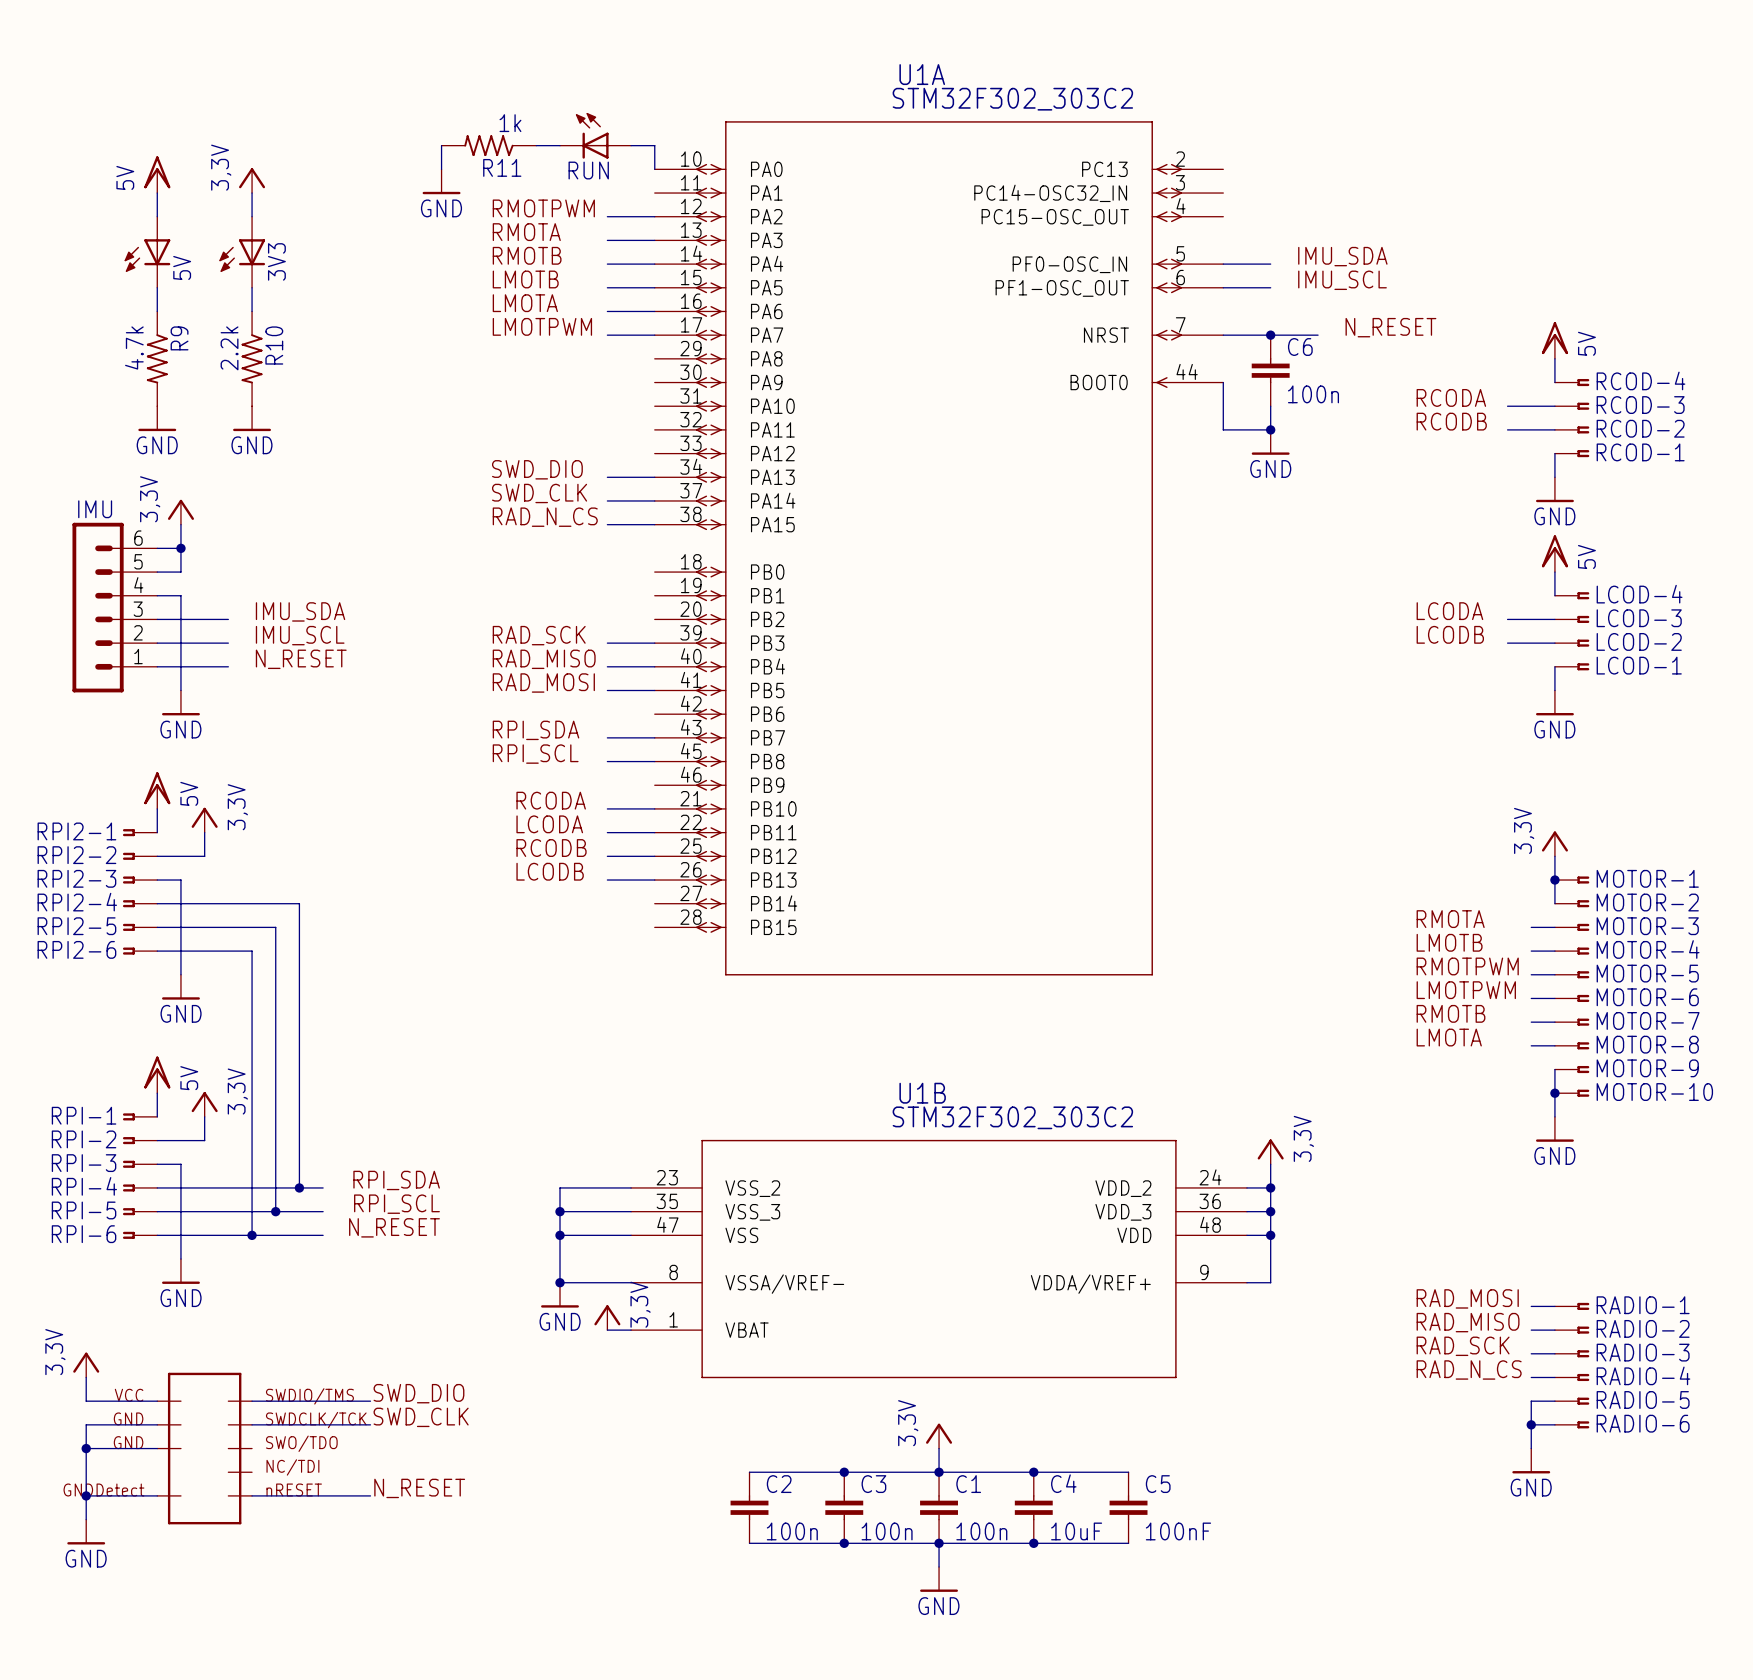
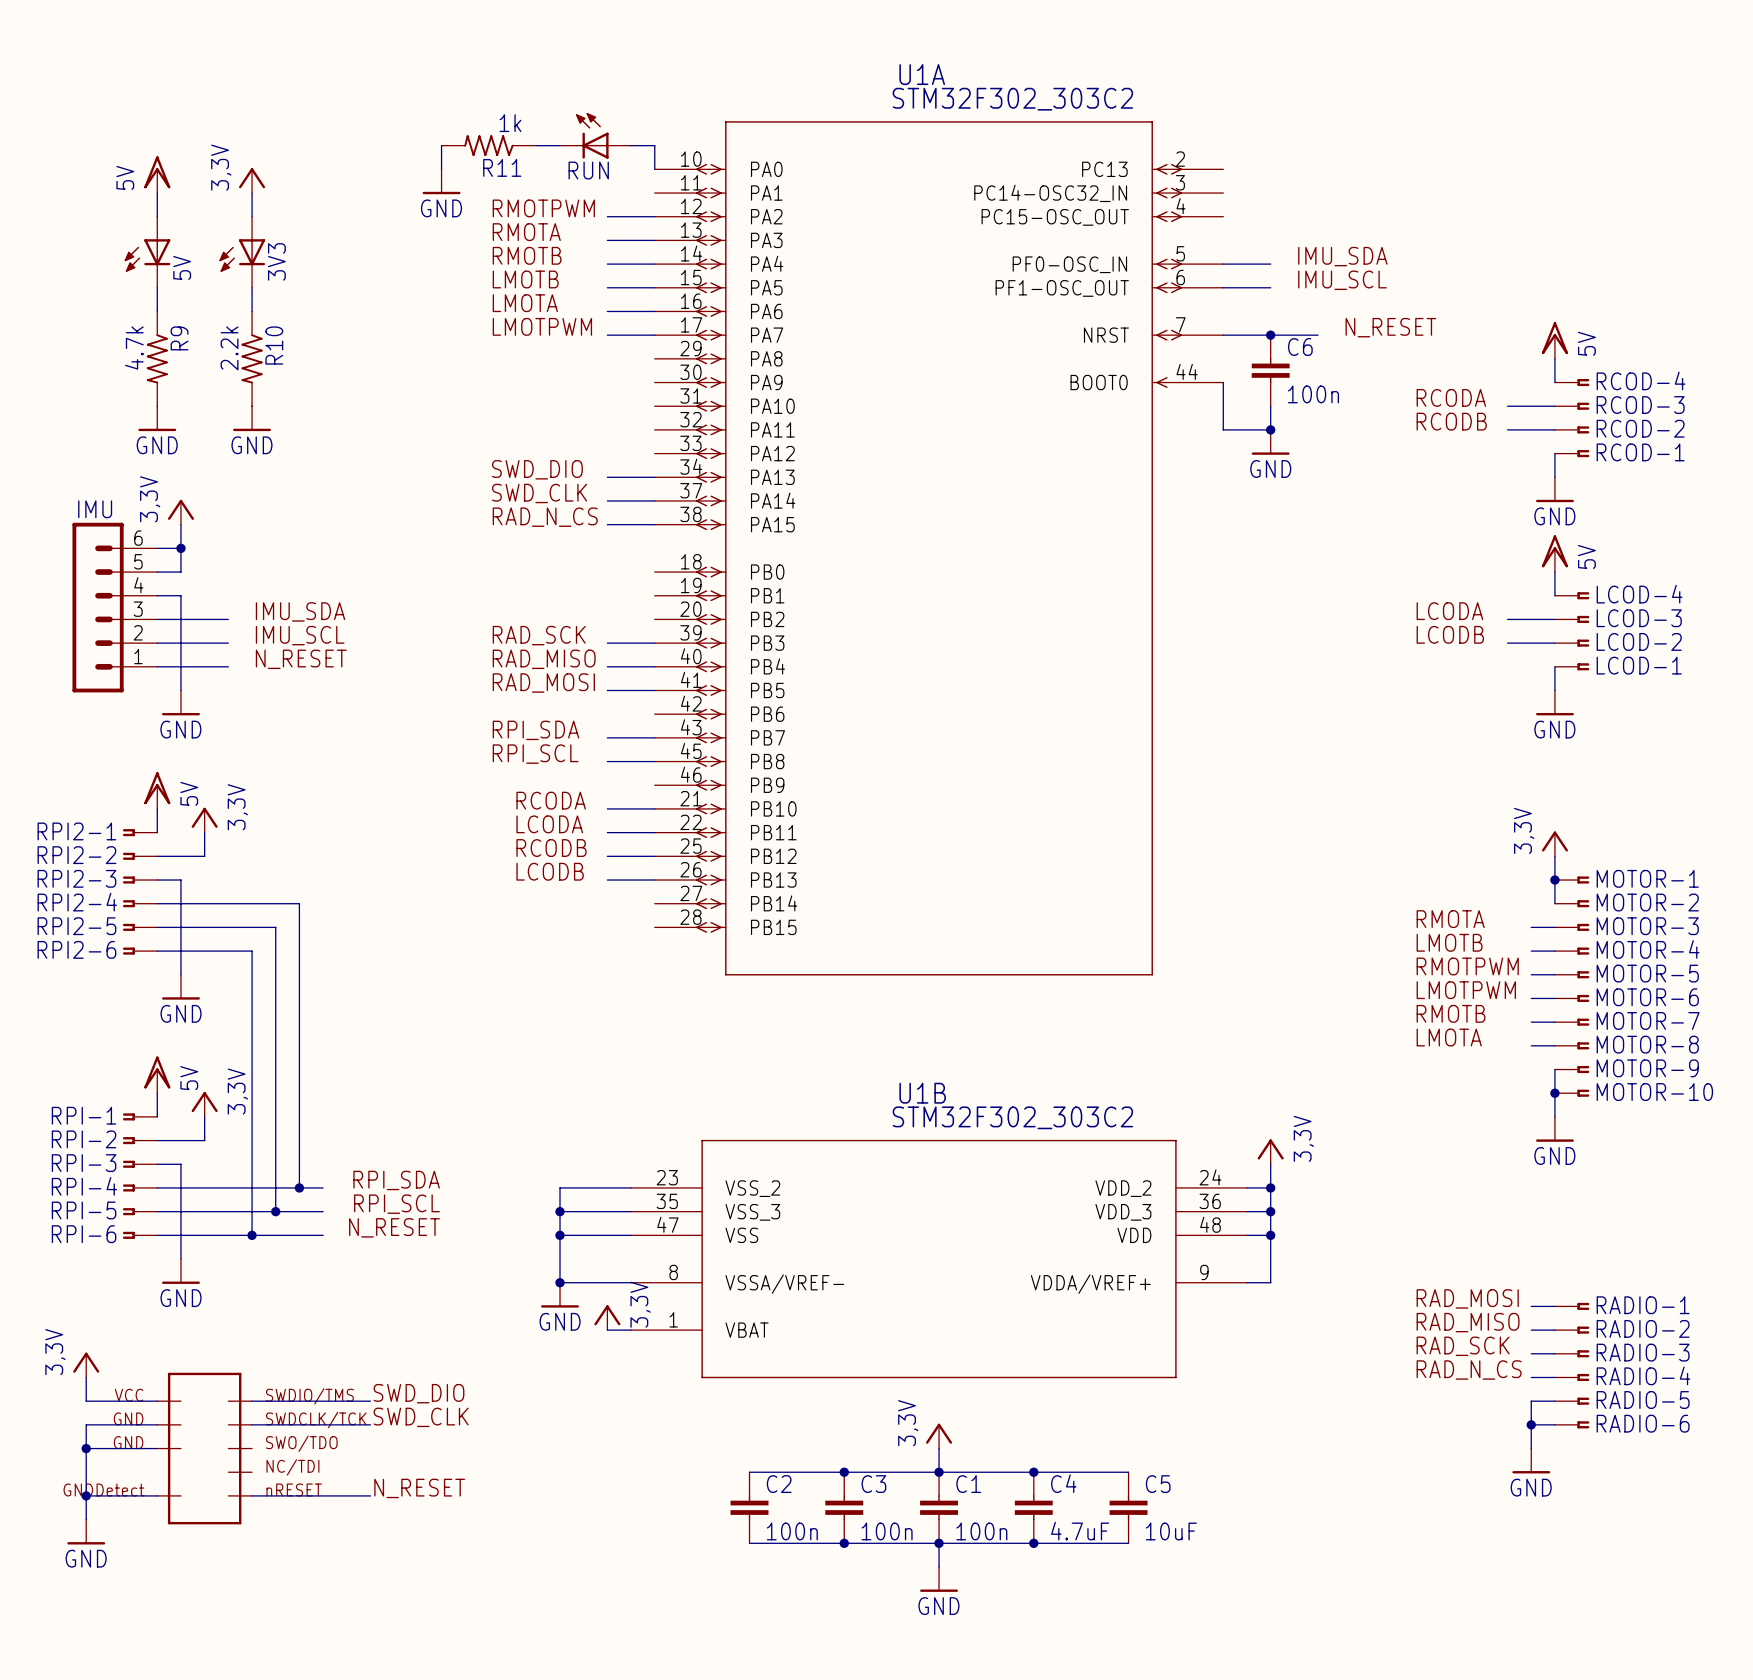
C4 value: 10uF (1076, 1531) -> 4.7uF (1080, 1531)
C5 value: 100nF (1178, 1531) -> 10uF (1171, 1531)

